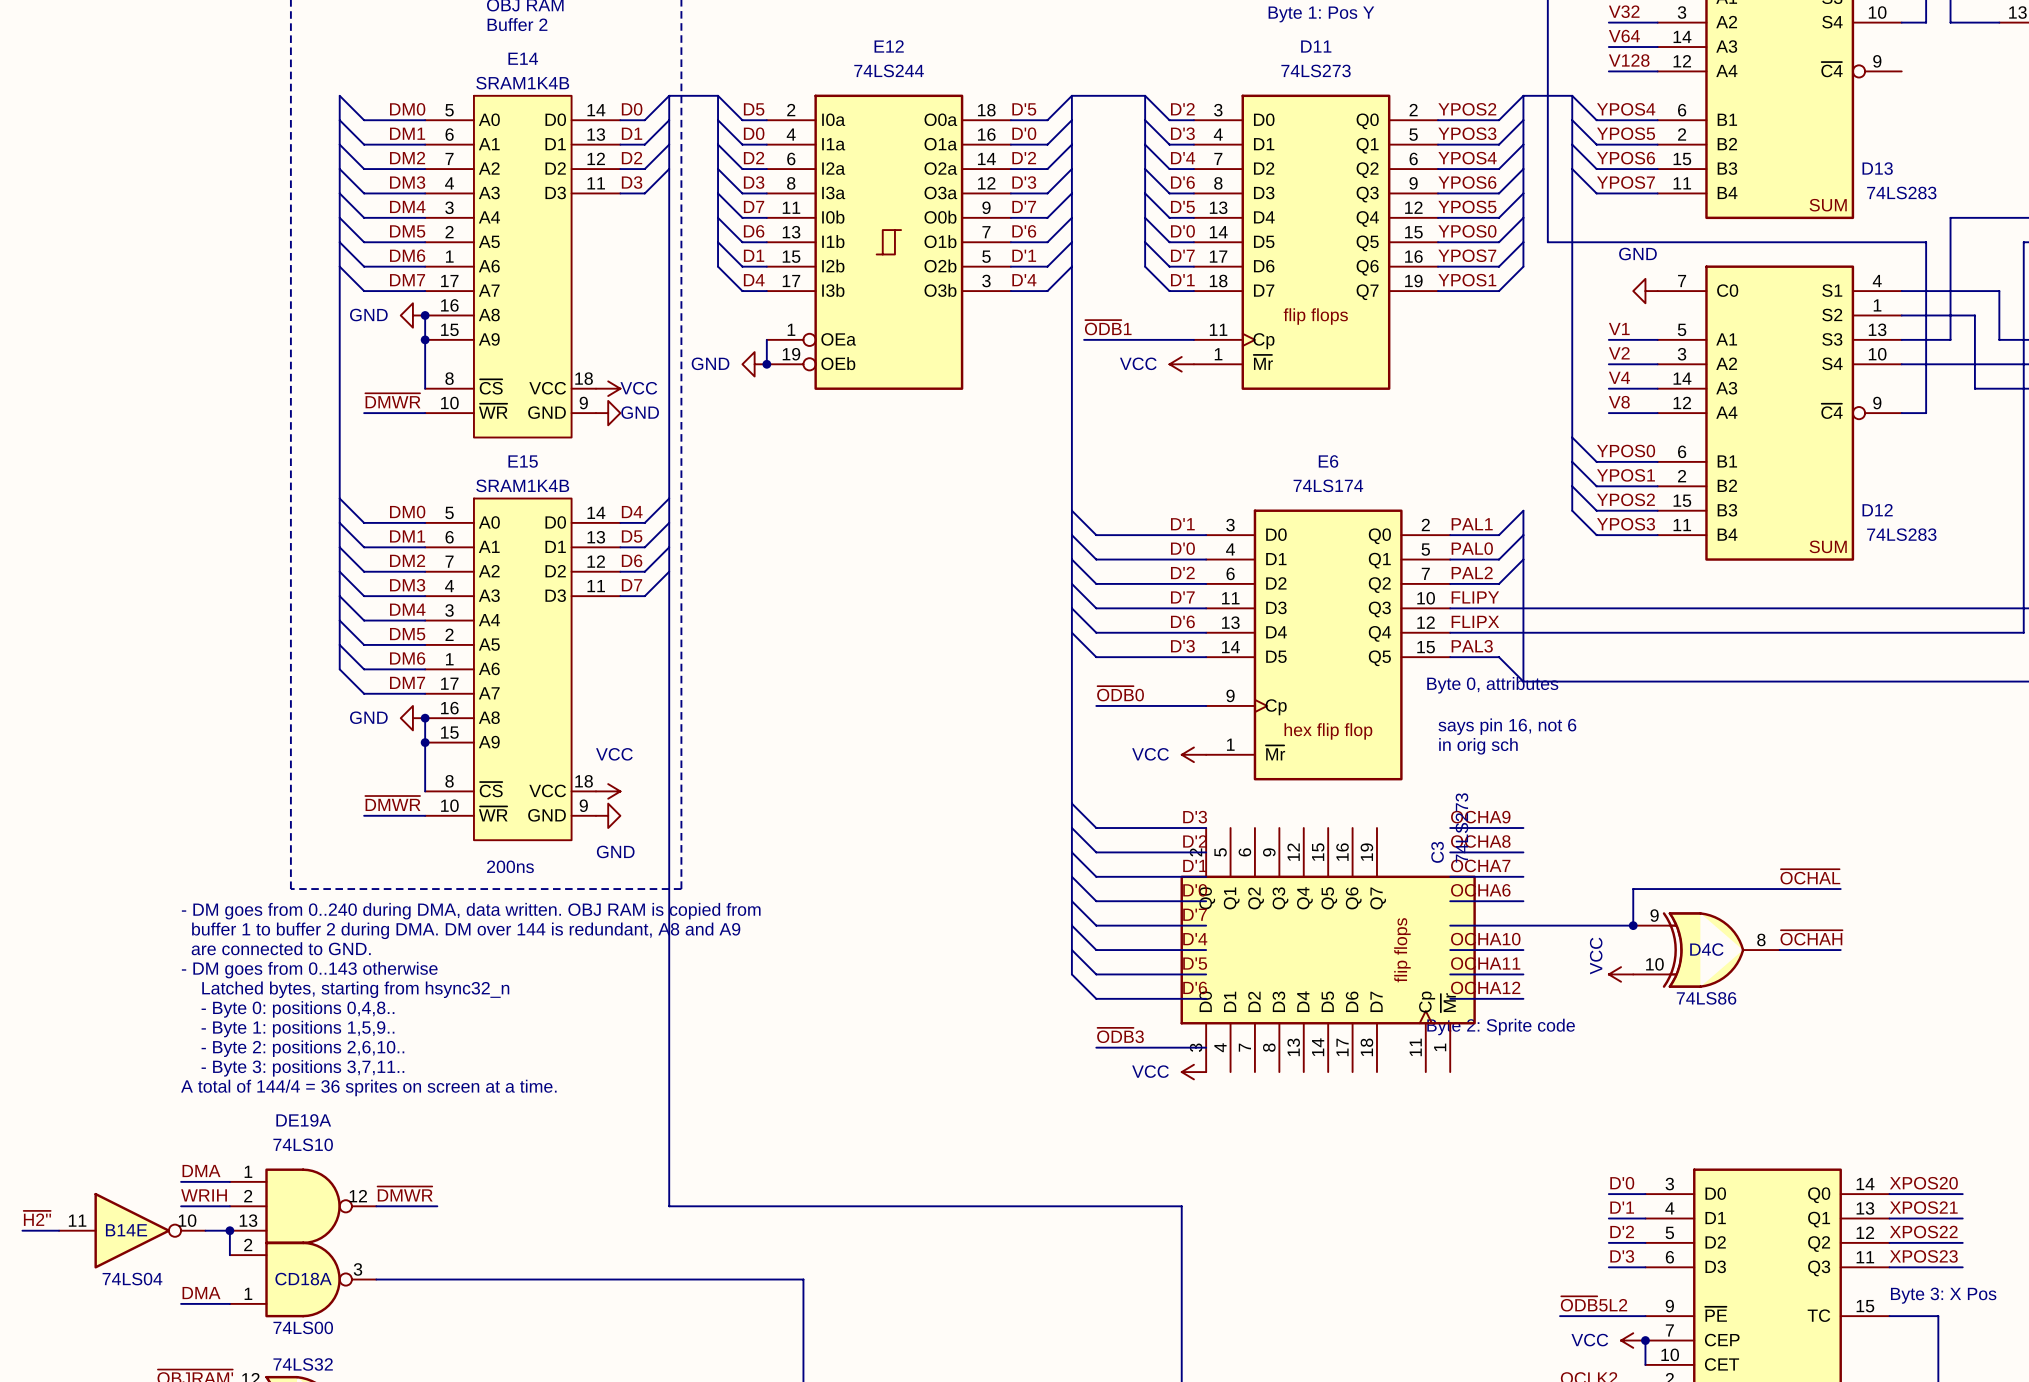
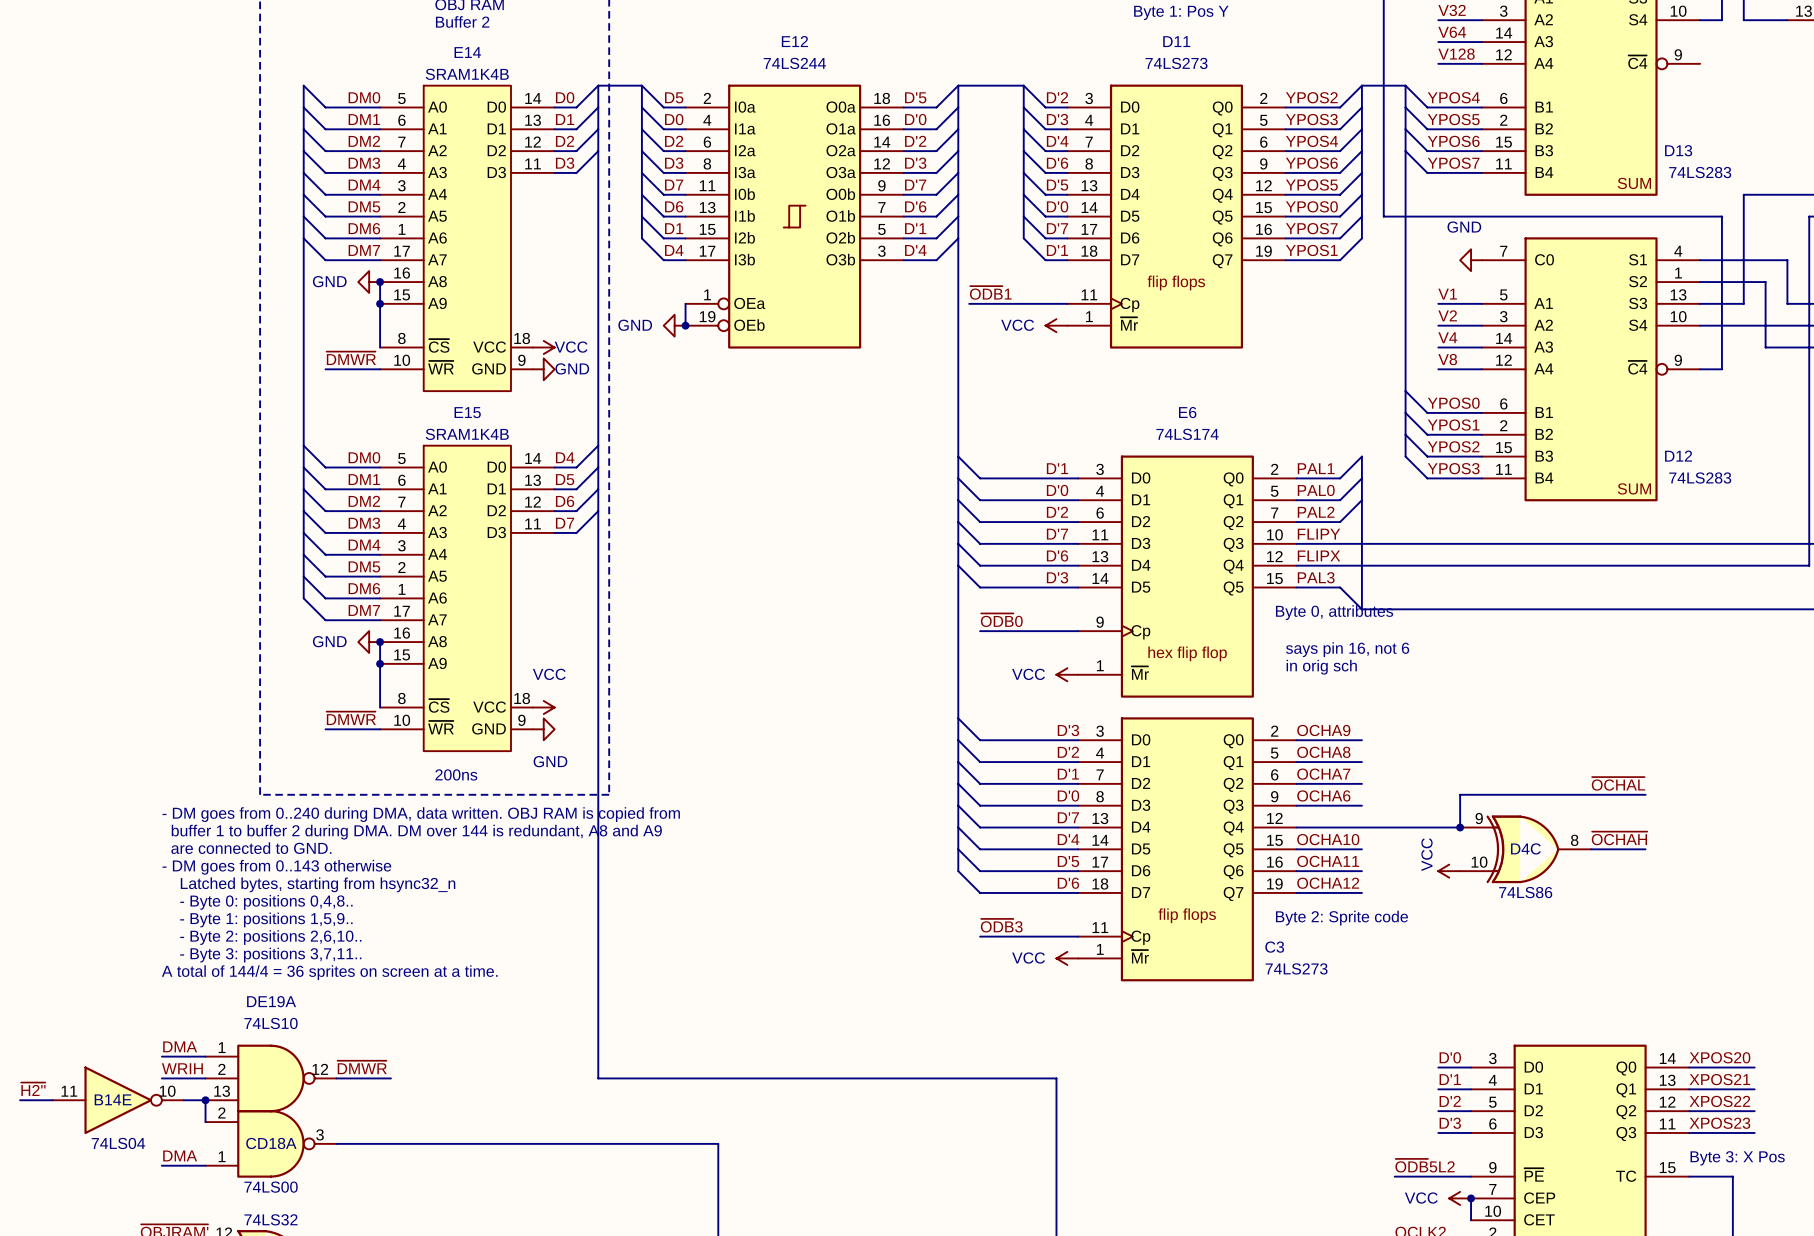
C3 rotation: 0° (1328, 950) -> 90° clockwise (1187, 849)

